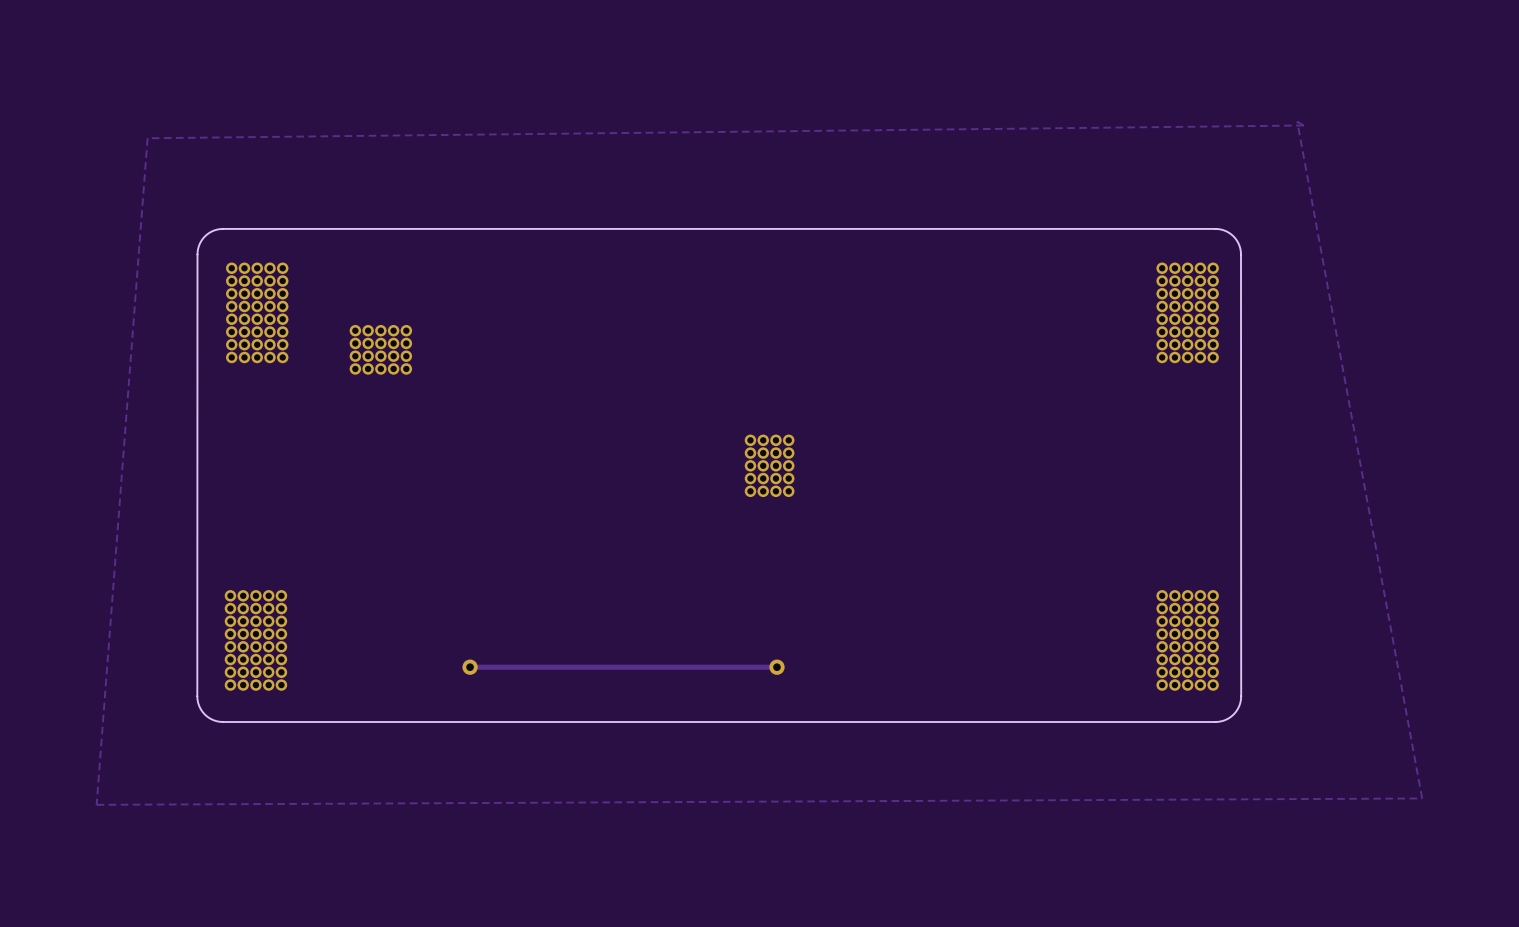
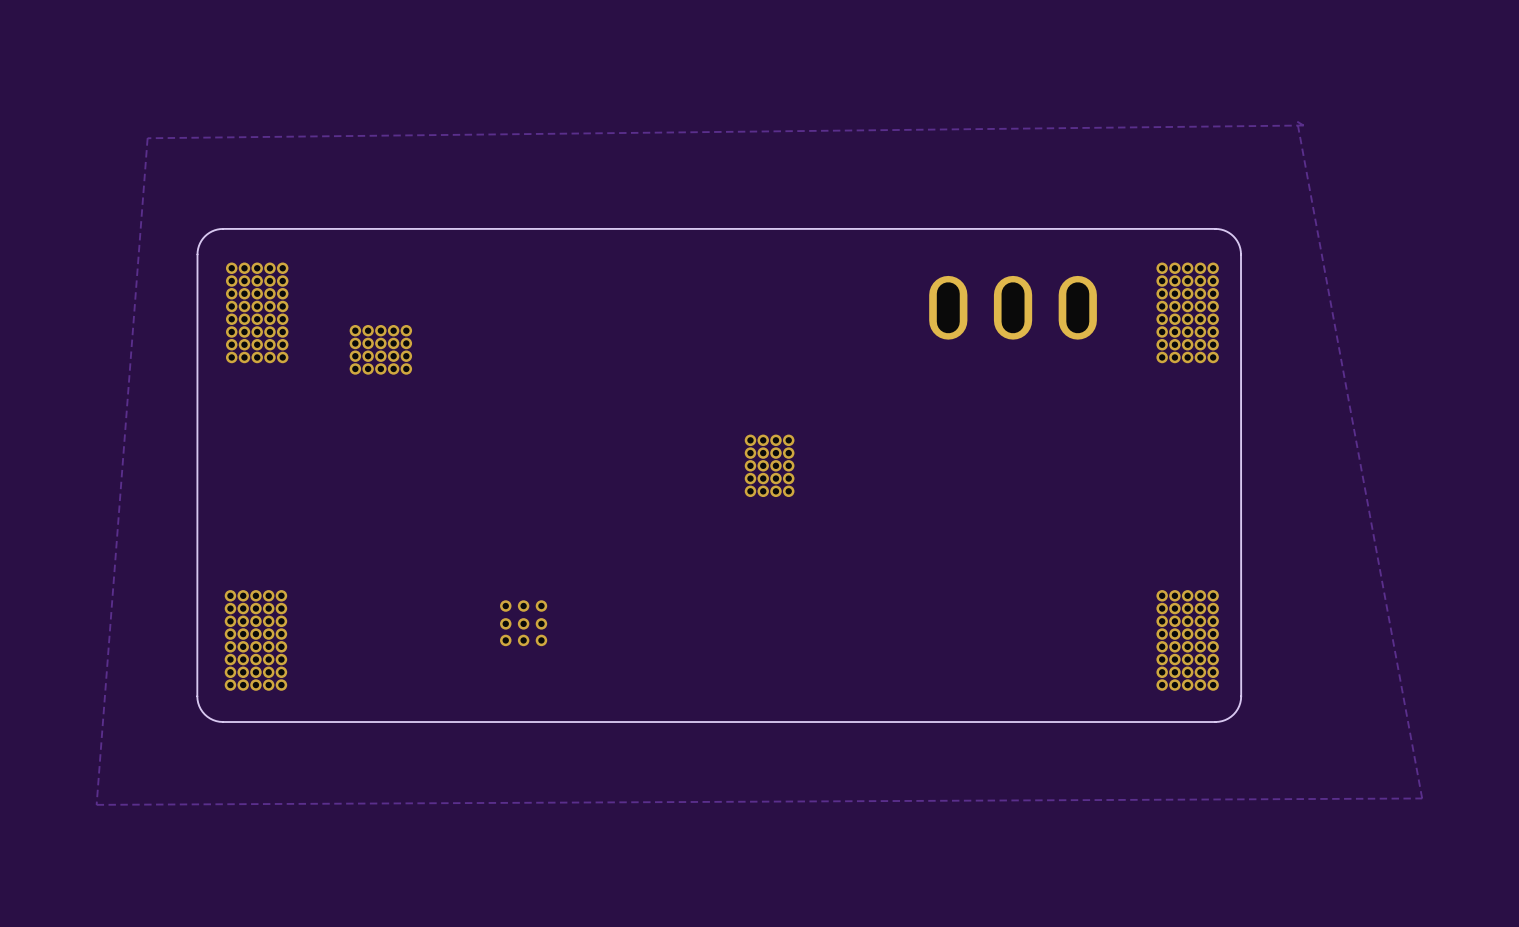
part: none -> (1013, 307)
via: none -> (505, 606)
via: none -> (523, 606)
via: none -> (541, 606)
via: none -> (505, 623)
via: none -> (523, 623)
via: none -> (541, 623)
via: none -> (505, 640)
via: none -> (523, 640)
via: none -> (541, 640)
via: (470, 667) -> none
track: (776, 667) (470, 667) -> none
via: (776, 667) -> none

